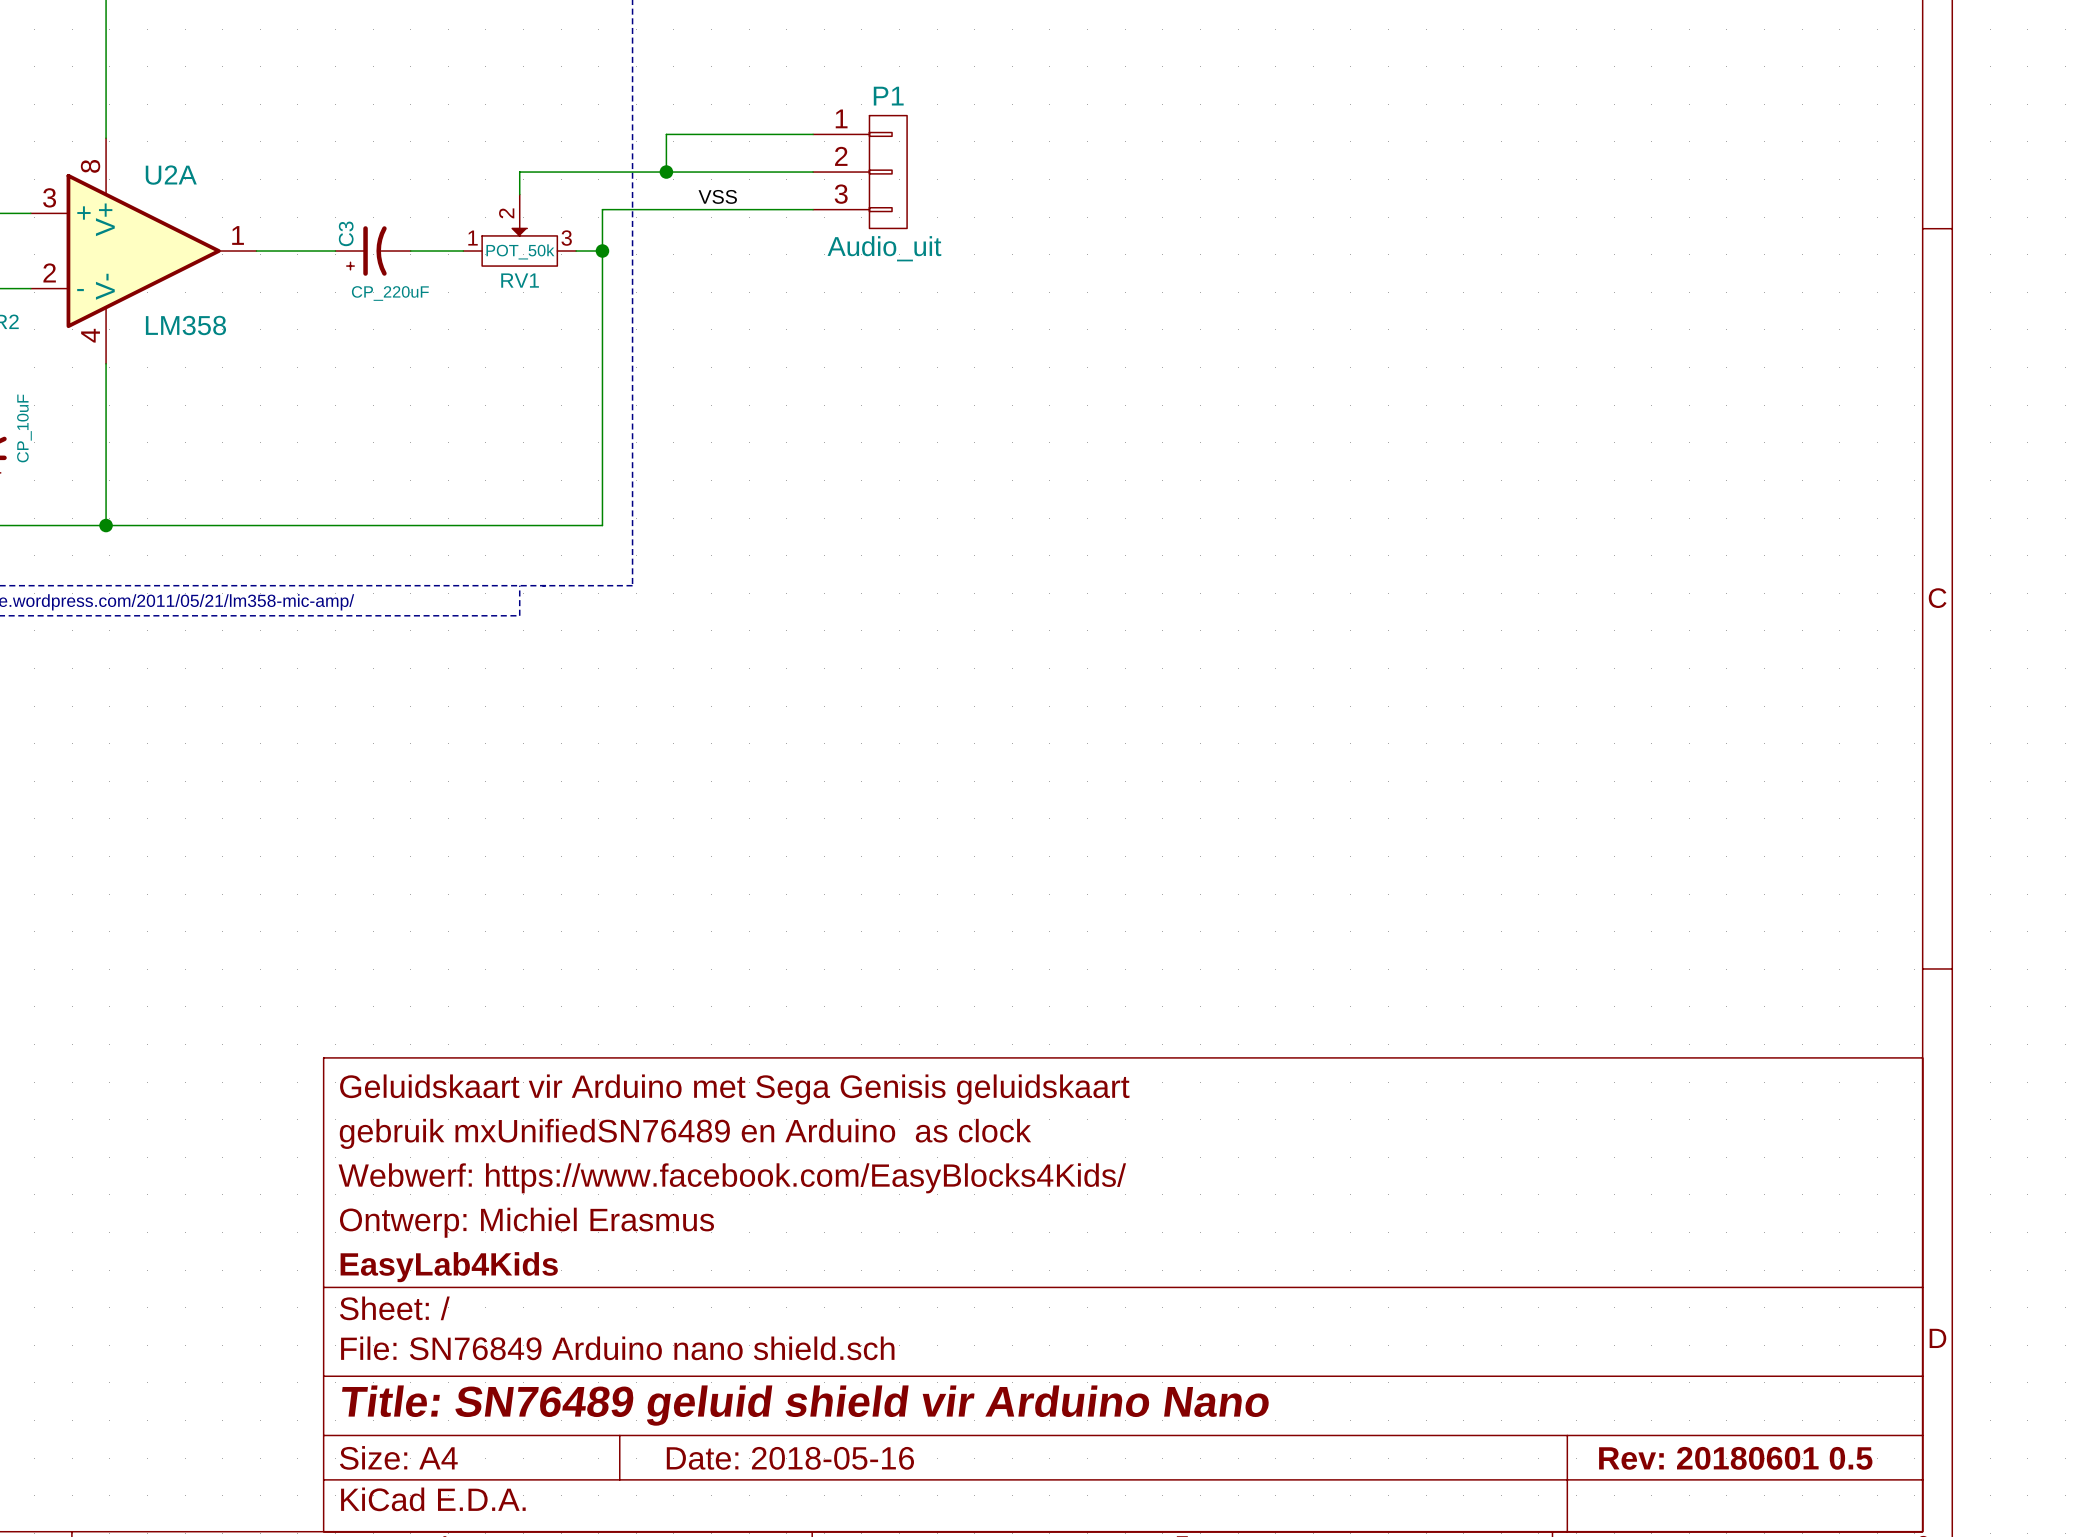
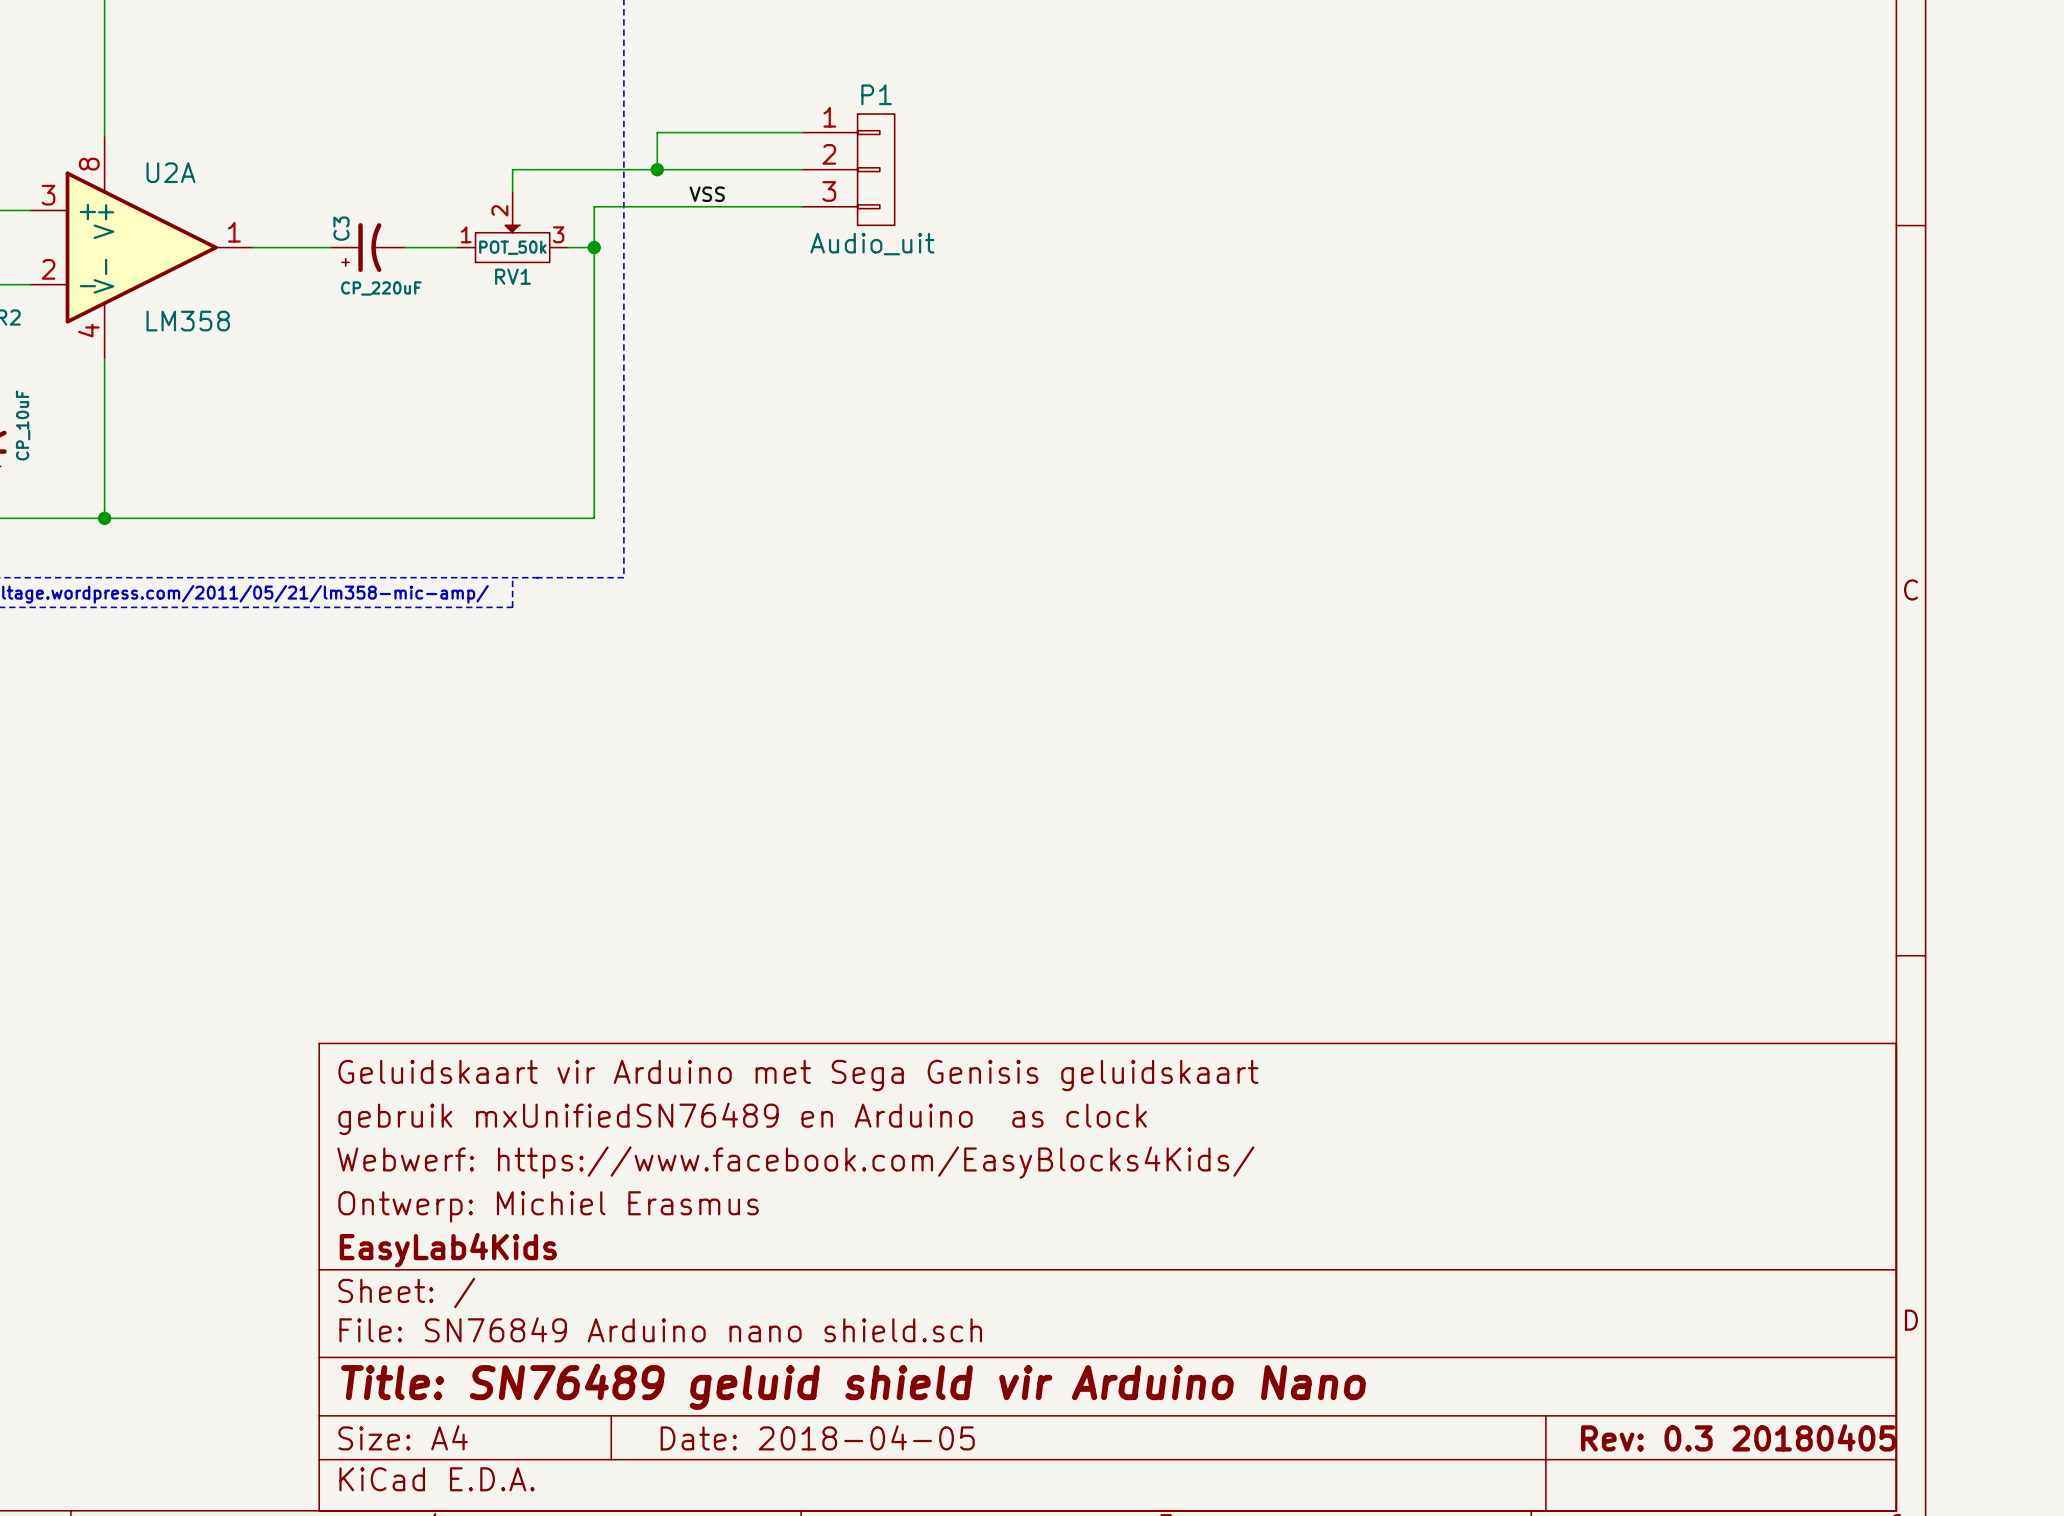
title block: Date: 2018-05-16 (790, 1458) -> Date: 2018-04-05 (817, 1437)
title block: Rev: 20180601 0.5 (1735, 1458) -> Rev: 0.3 20180405 (1738, 1437)

